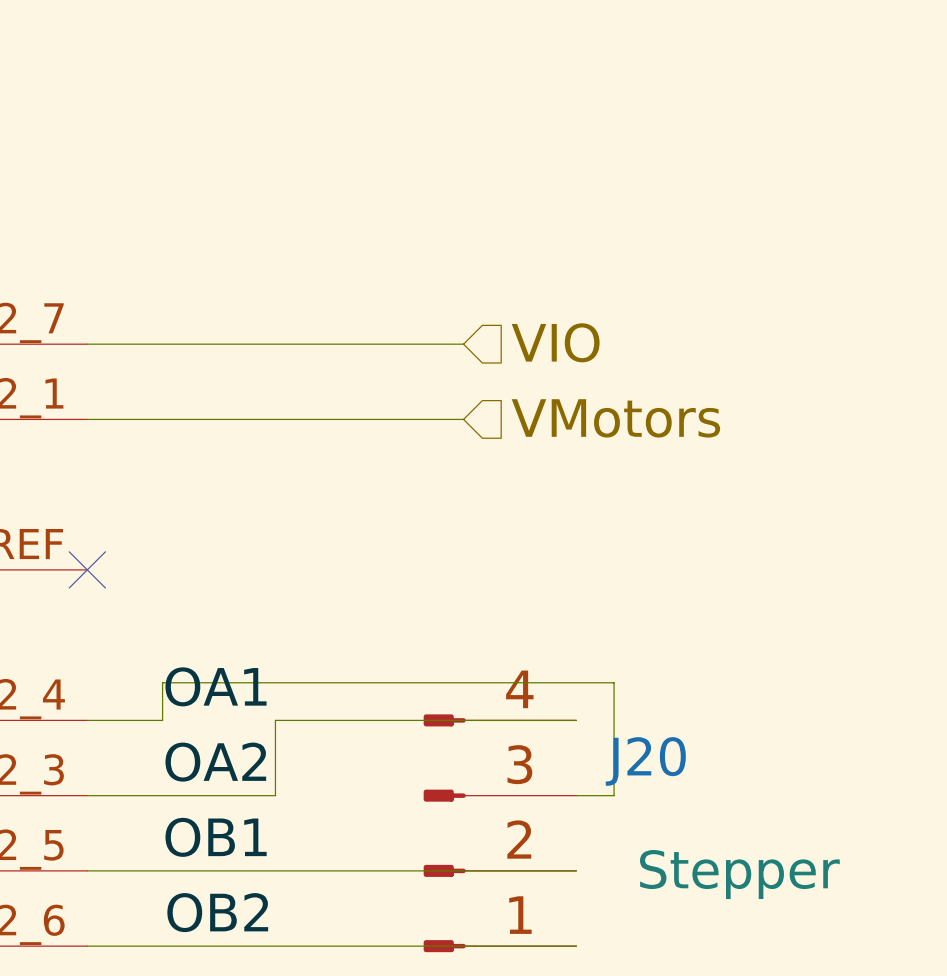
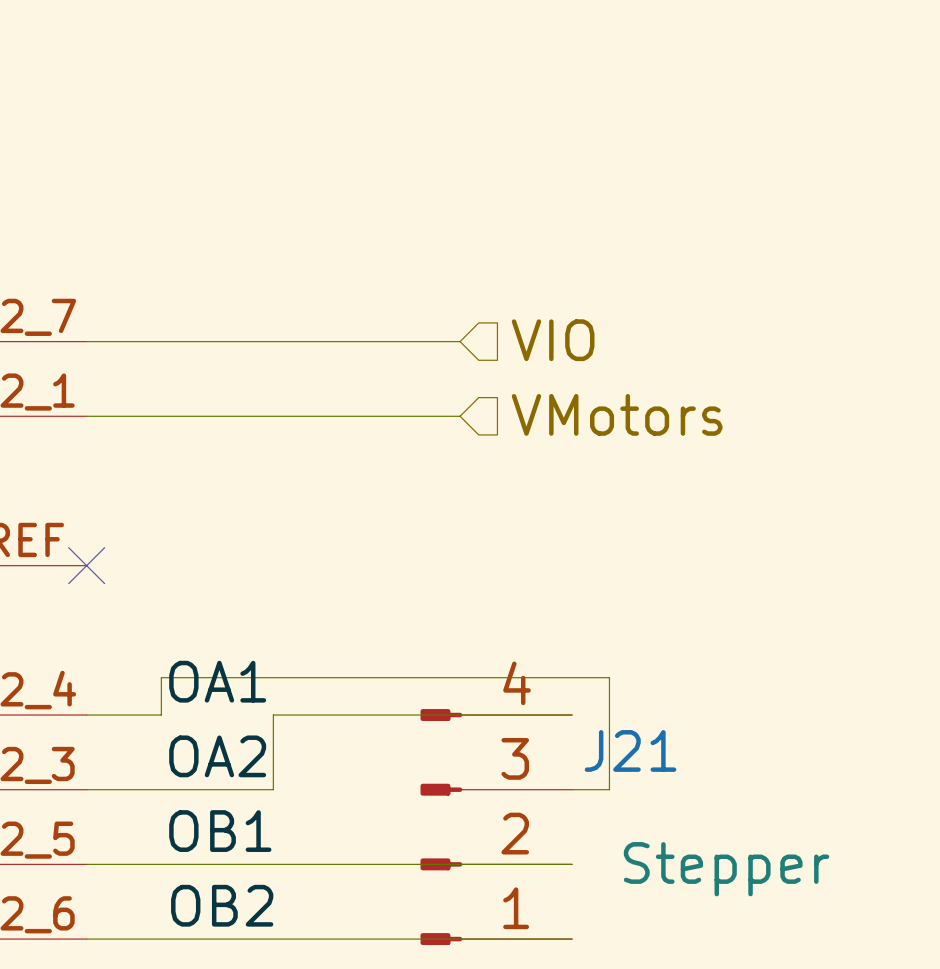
J20 name: J20 (645, 761) -> J21 (630, 750)

